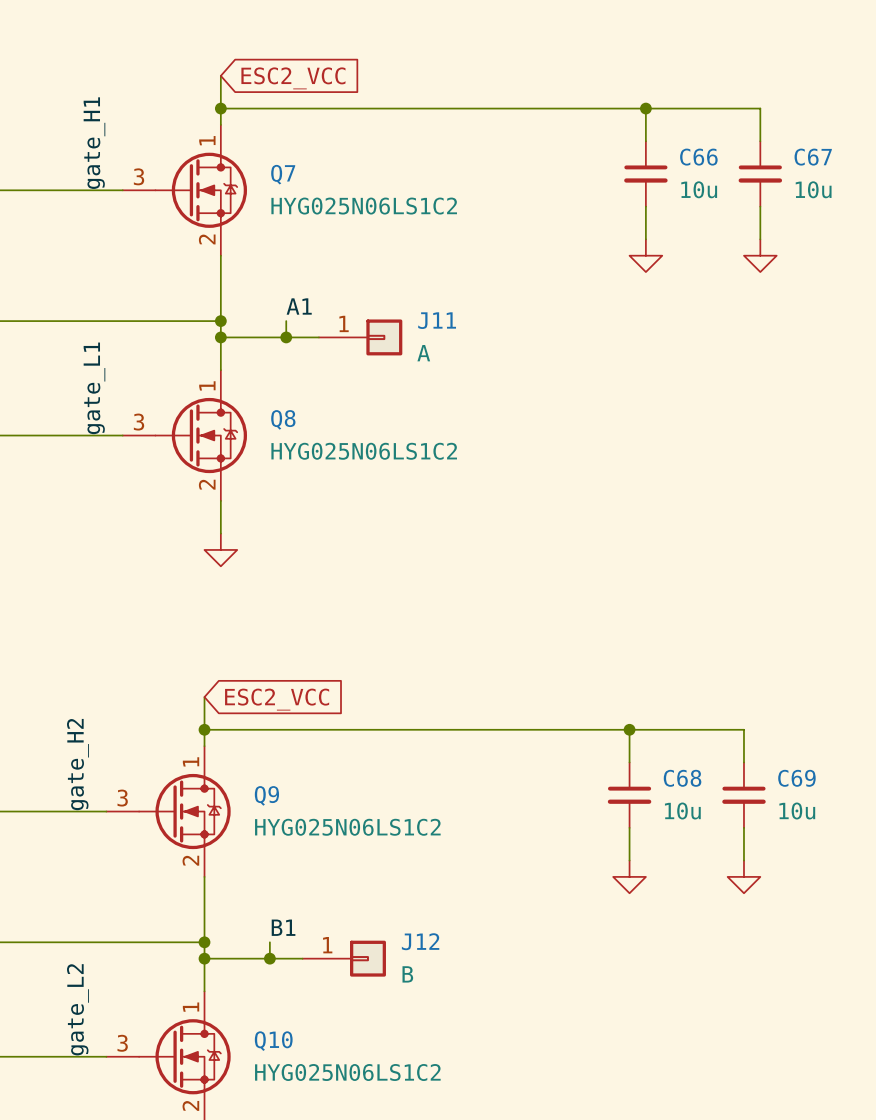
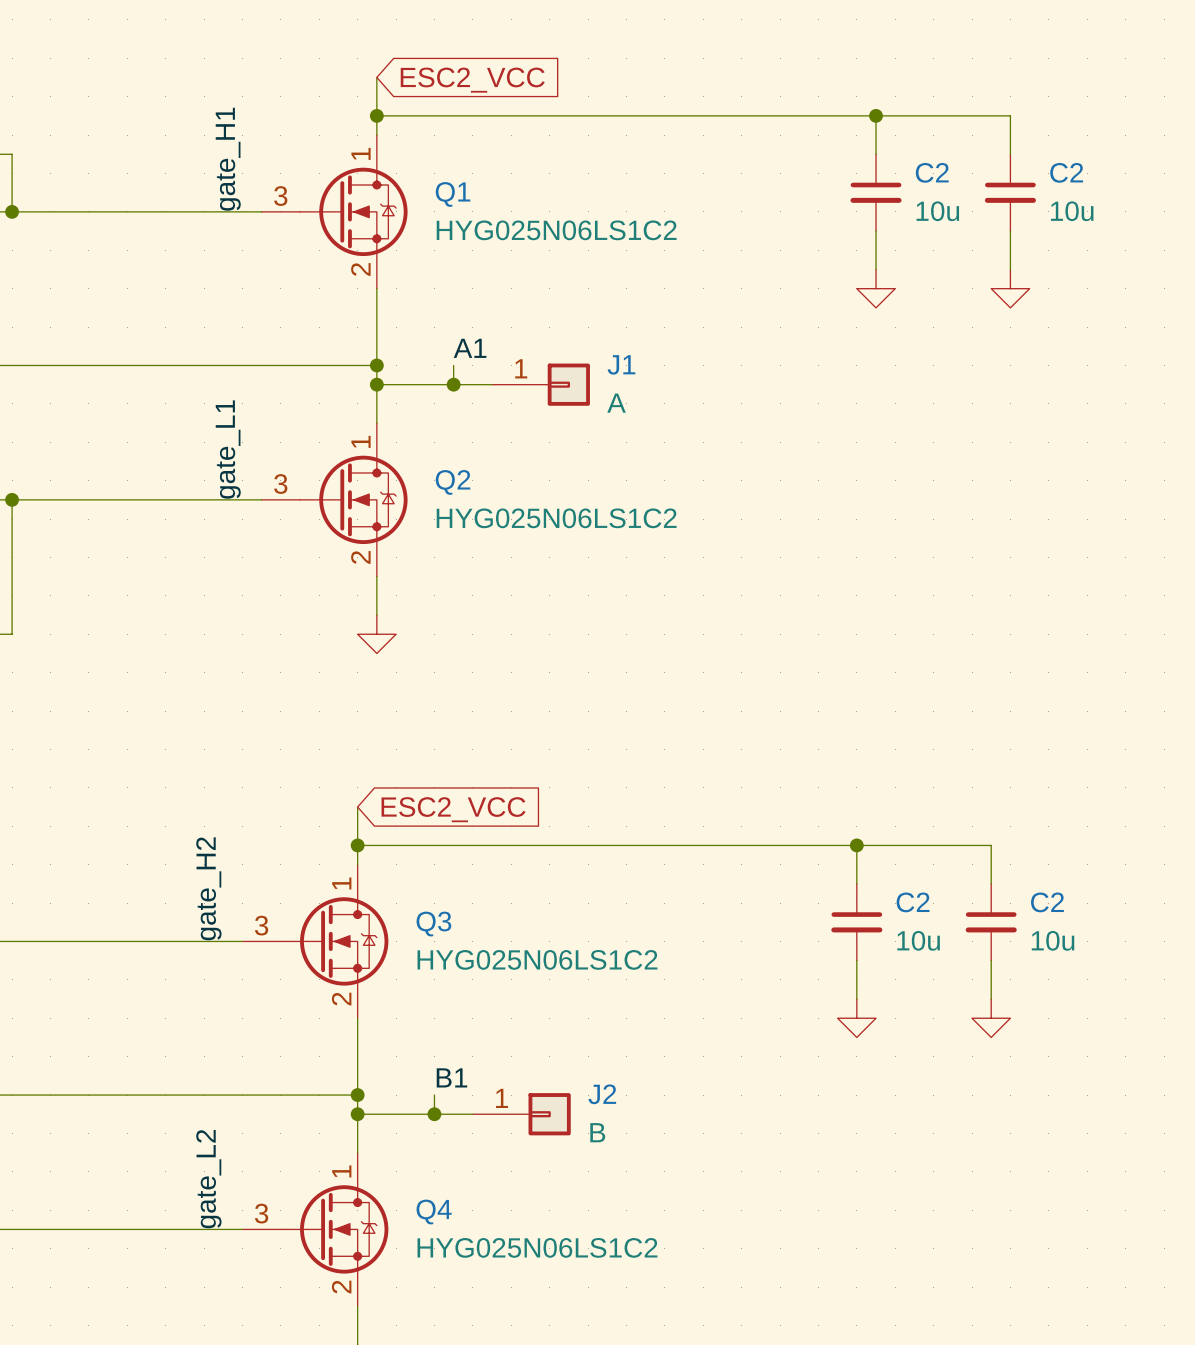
C66 name: C66 (698, 157) -> C2 (932, 172)
C67 name: C67 (813, 157) -> C2 (1066, 172)
Q7 name: Q7 (283, 174) -> Q1 (453, 194)
J11 name: J11 (437, 320) -> J1 (621, 364)
Q8 name: Q8 (283, 419) -> Q2 (453, 482)
C68 name: C68 (682, 778) -> C2 (913, 902)
C69 name: C69 (796, 778) -> C2 (1047, 902)
Q9 name: Q9 (266, 795) -> Q3 (433, 924)
J12 name: J12 (420, 941) -> J2 (602, 1094)
Q10 name: Q10 (273, 1041) -> Q4 (434, 1212)

